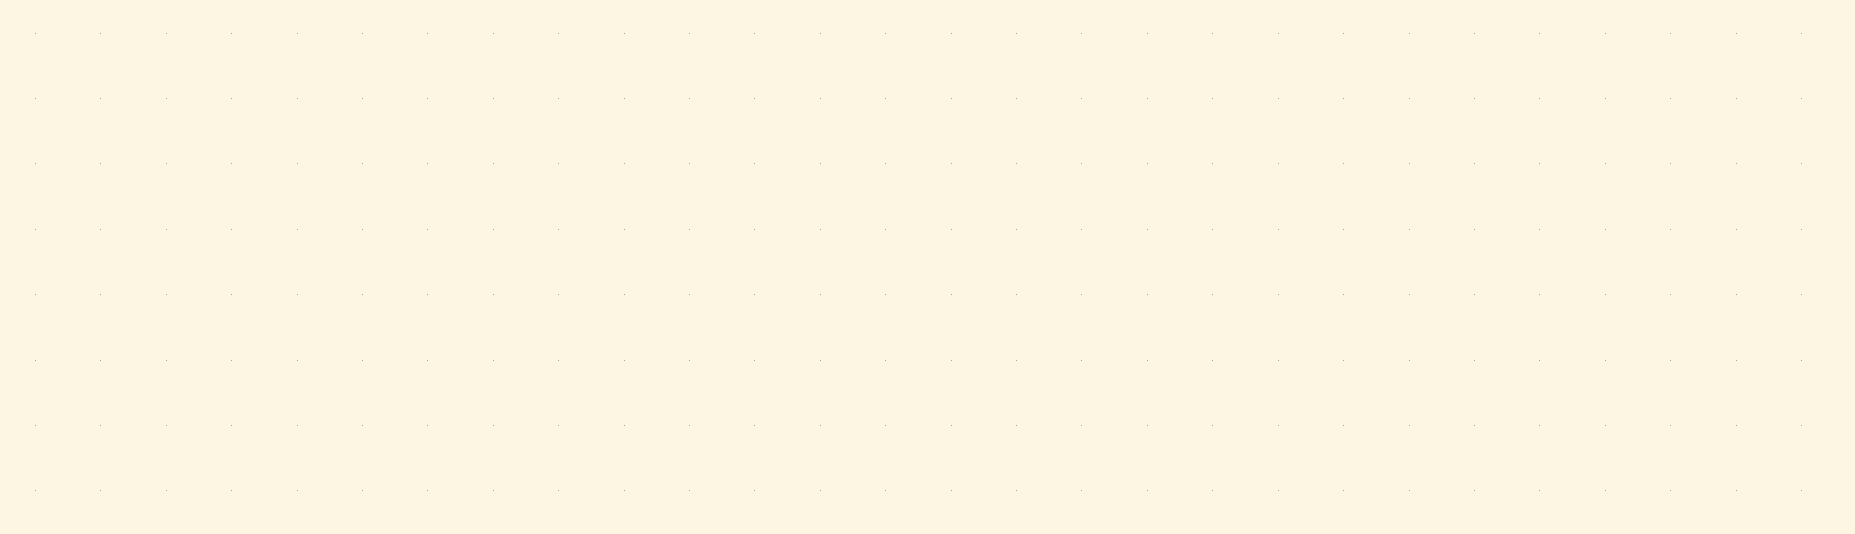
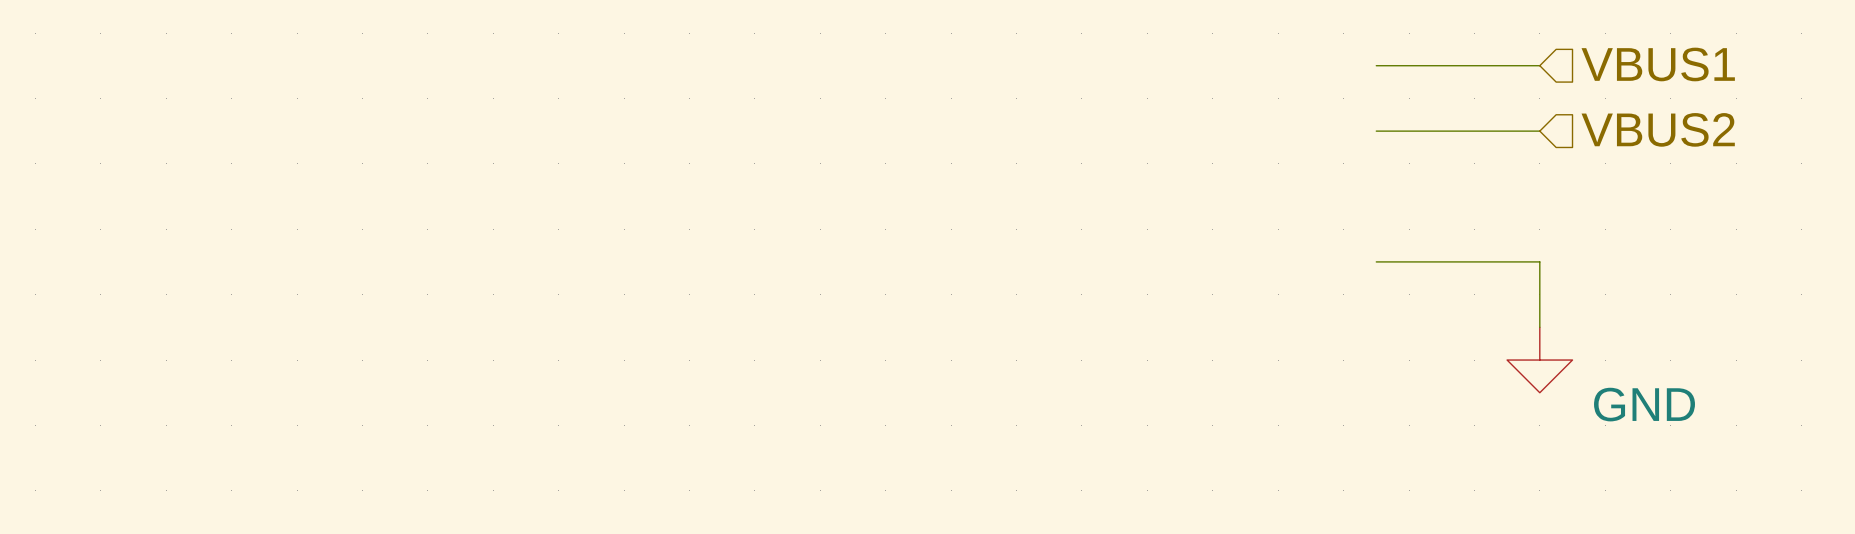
hierarchical label: none -> VBUS1 (1658, 64)
wire: none -> (1376, 65) (1539, 65)
hierarchical label: none -> VBUS2 (1658, 129)
wire: none -> (1376, 131) (1539, 131)
wire: none -> (1376, 261) (1539, 261) (1539, 327)
power symbol: none -> GND (1539, 360)

